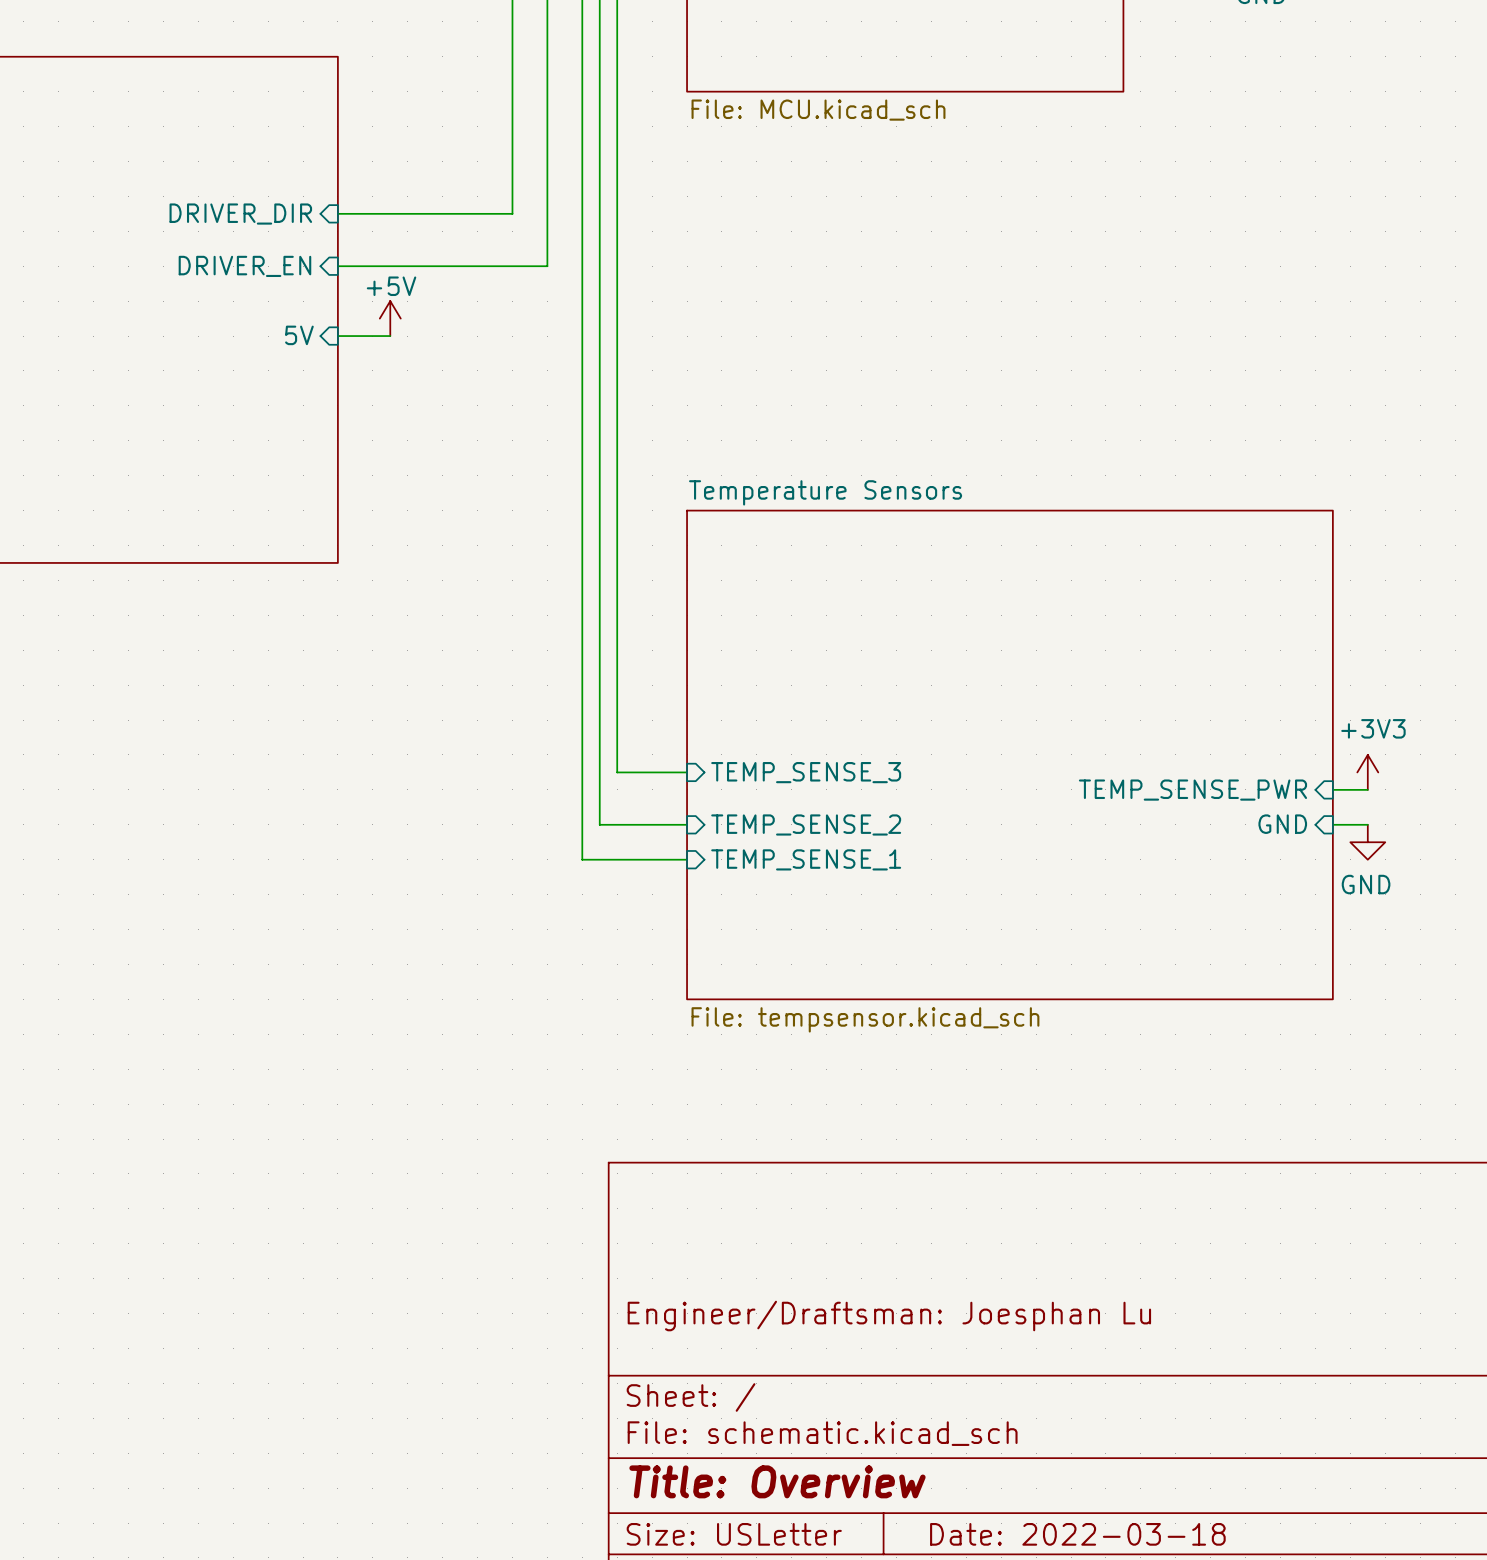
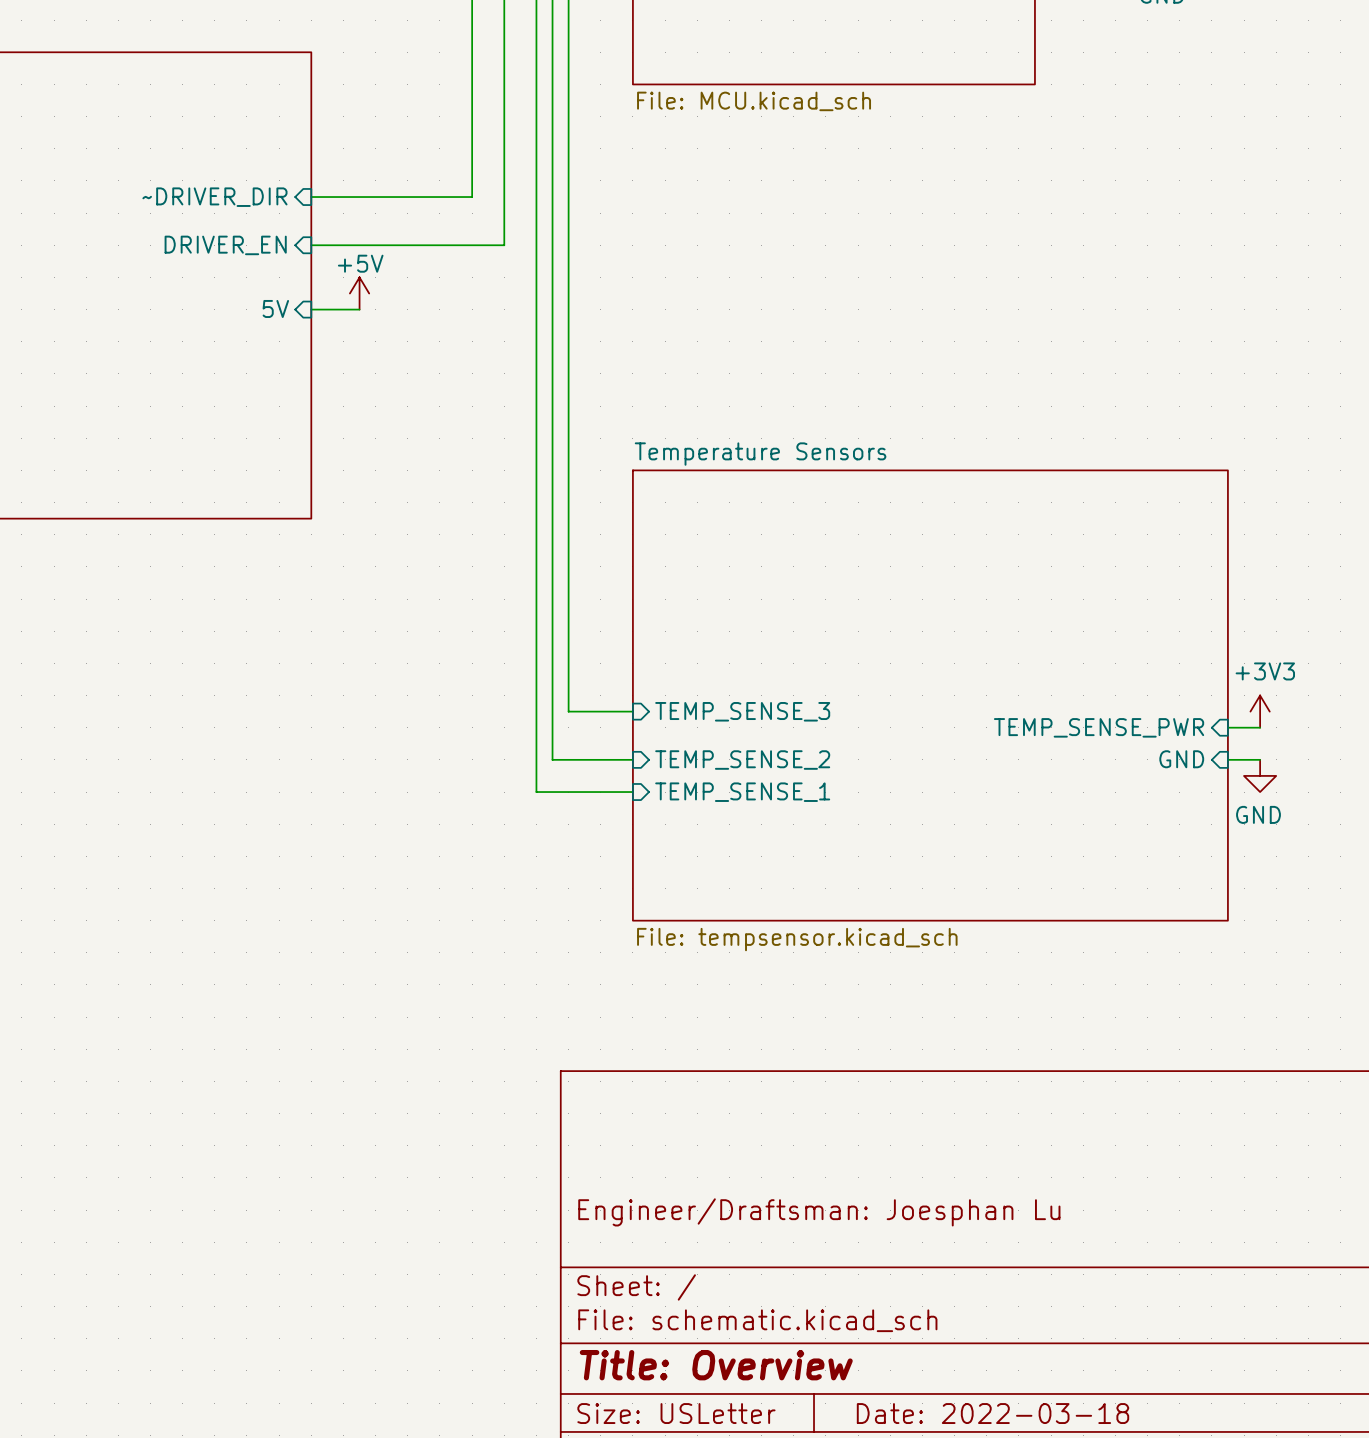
sheet pin: DRIVER_DIR (240, 214) -> ~DRIVER_DIR (214, 197)

